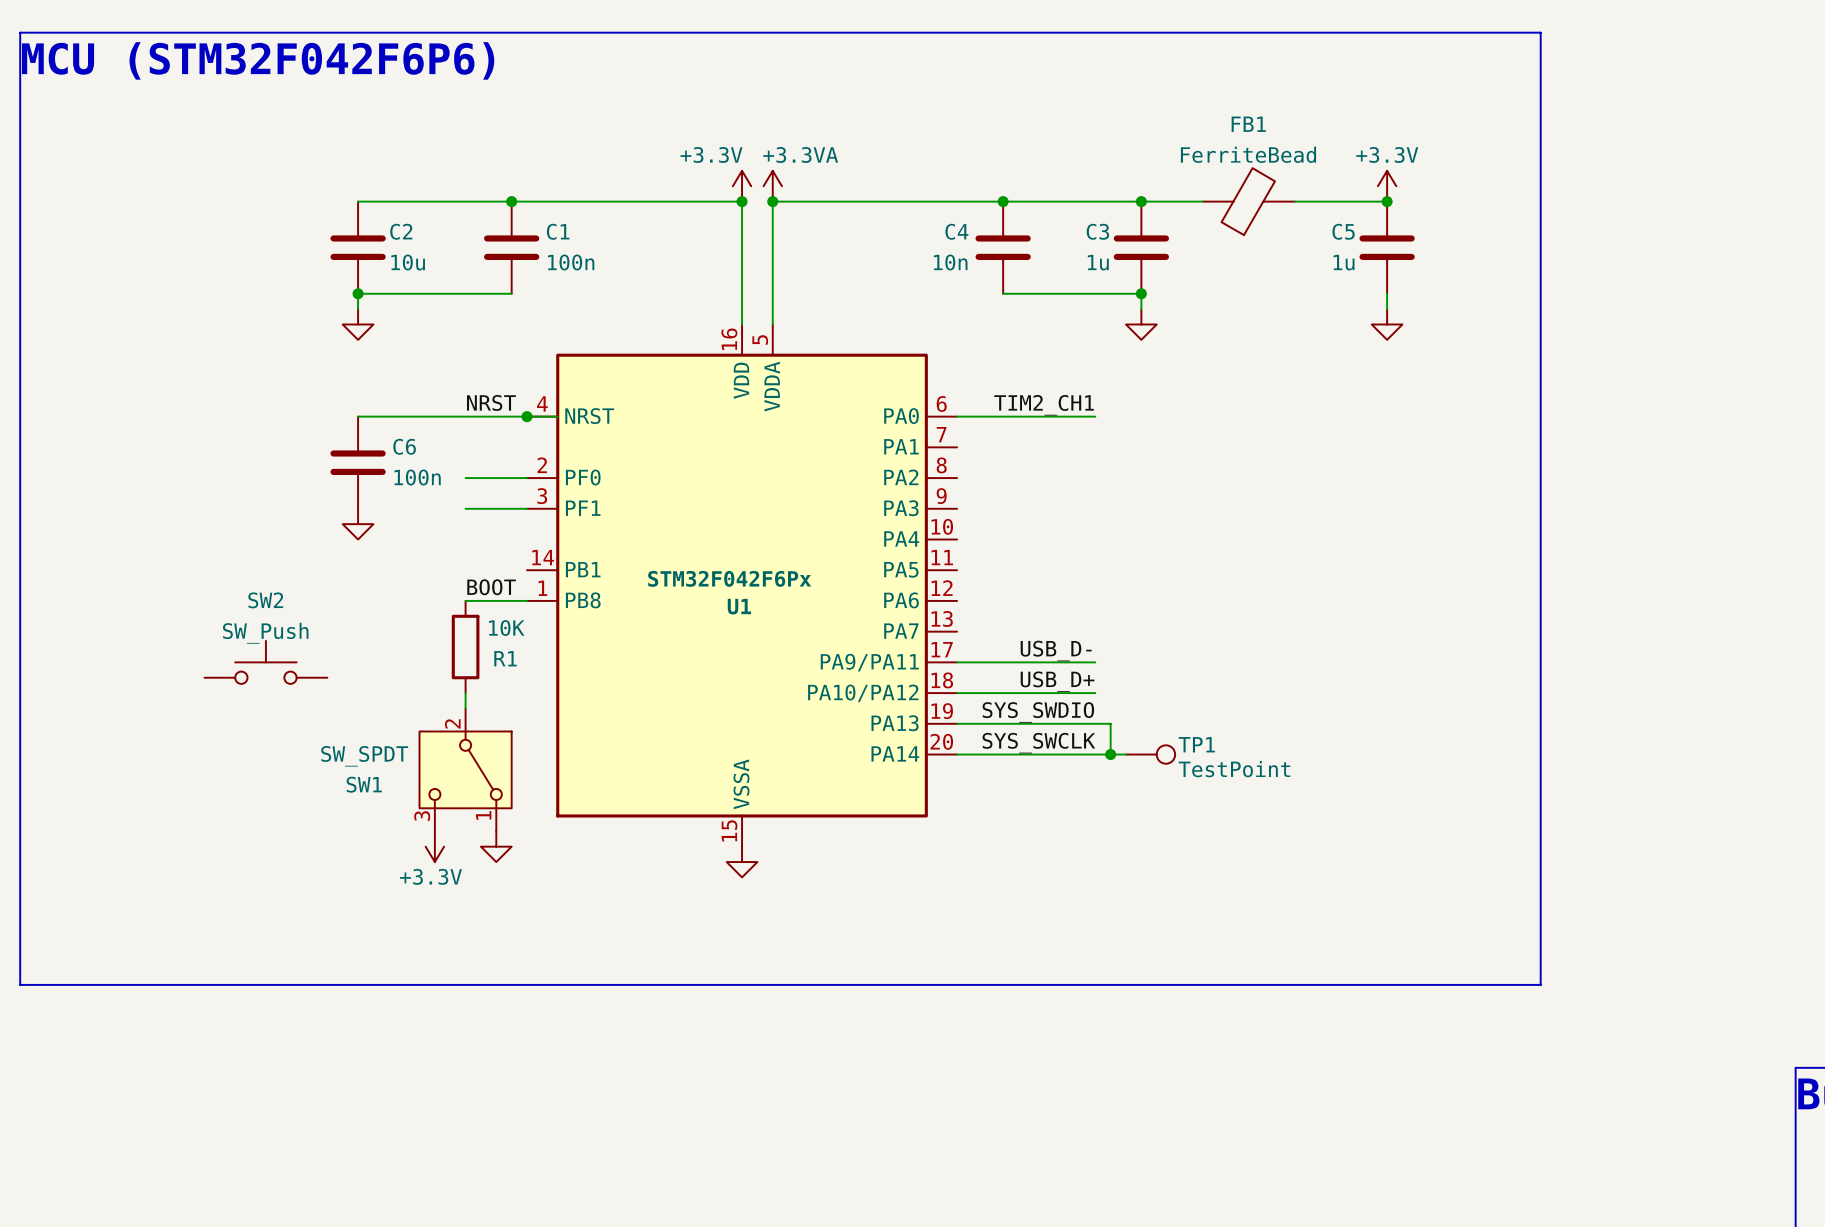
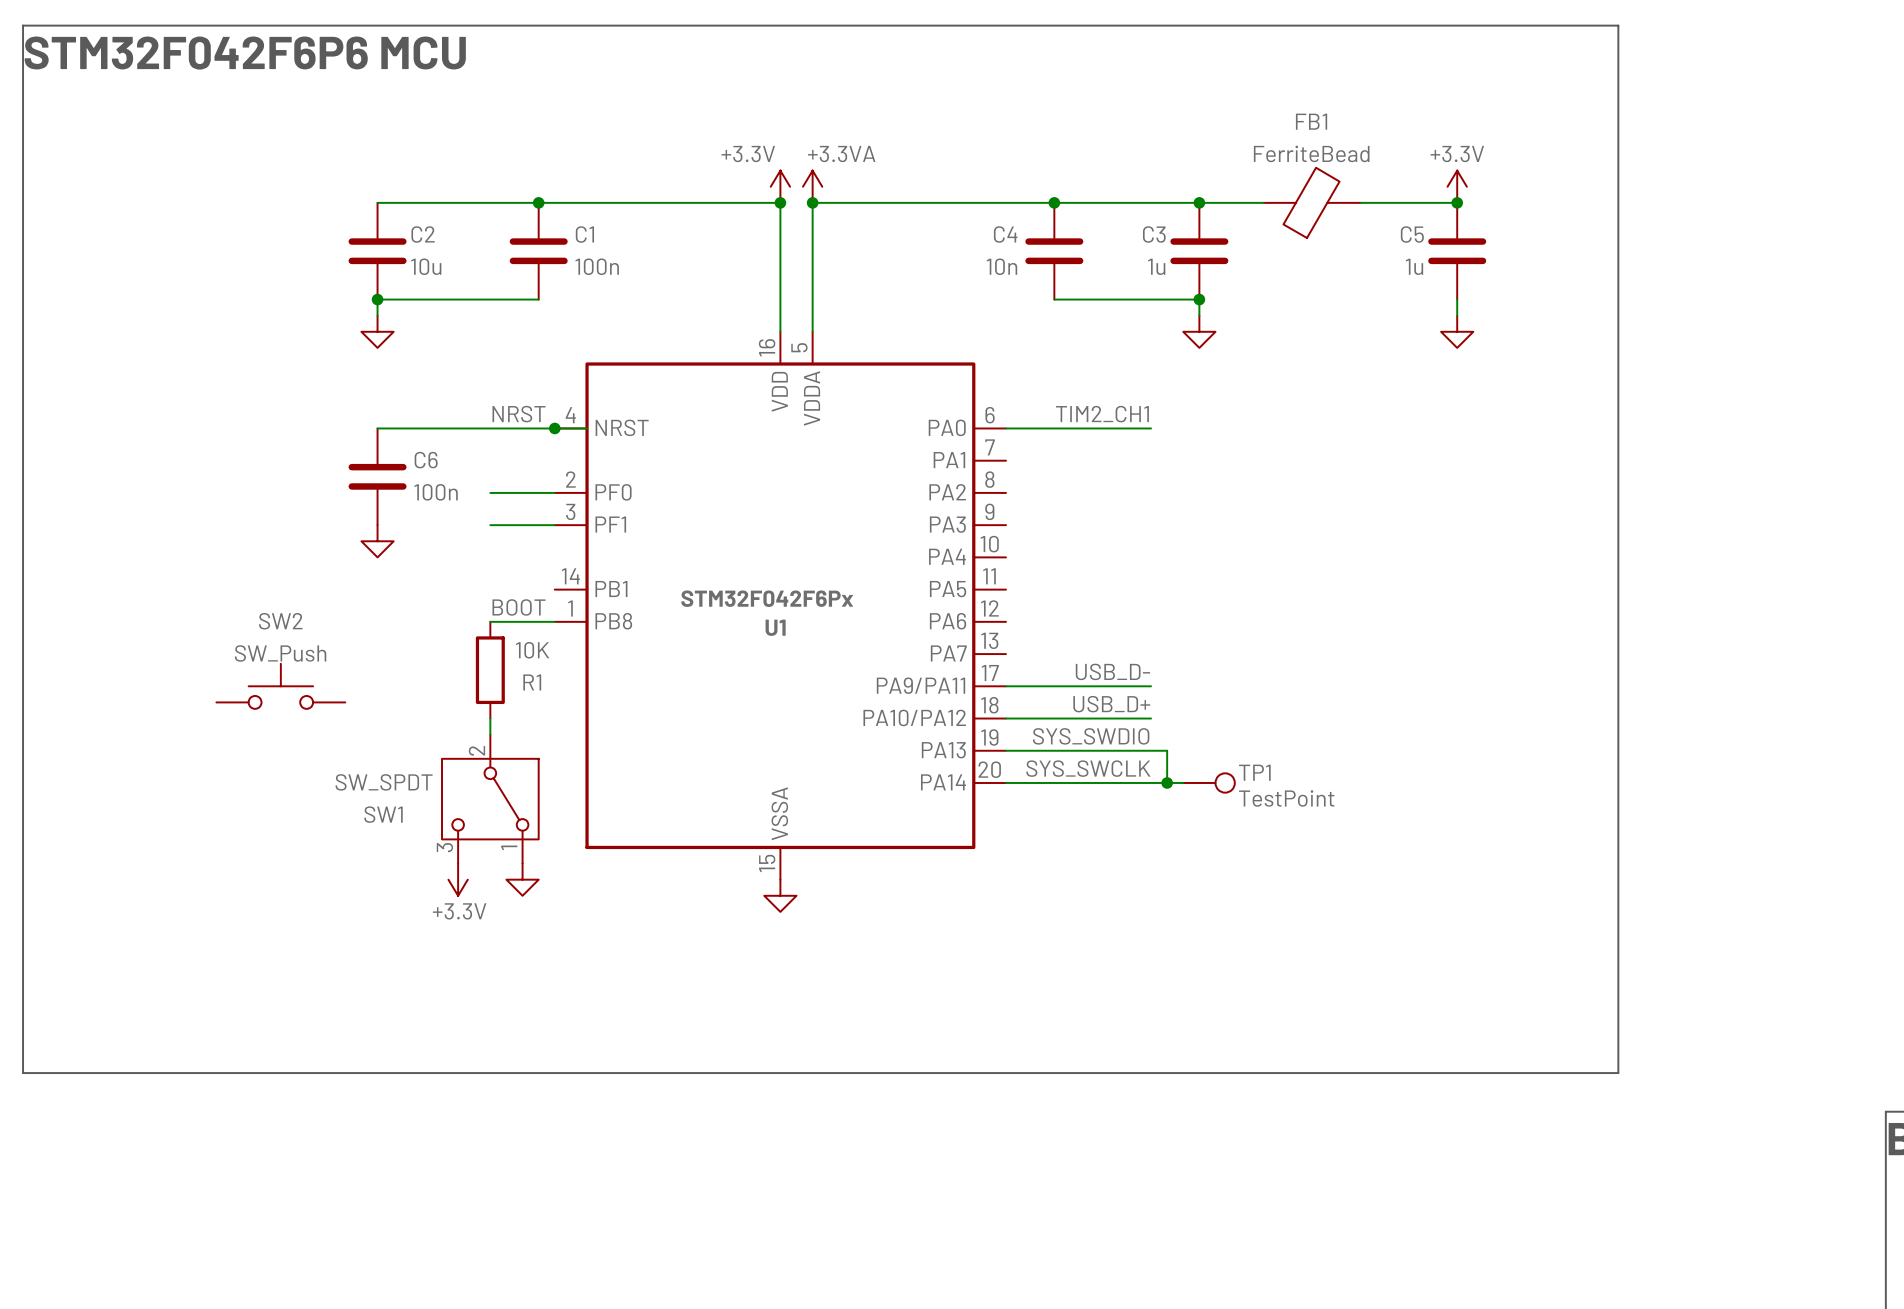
text: MCU (STM32F042F6P6) (258, 60) -> STM32F042F6P6 MCU (245, 53)
line: (20, 984) (1540, 984) -> (23, 1024) (23, 1073) (1618, 1073) (1618, 1024)

